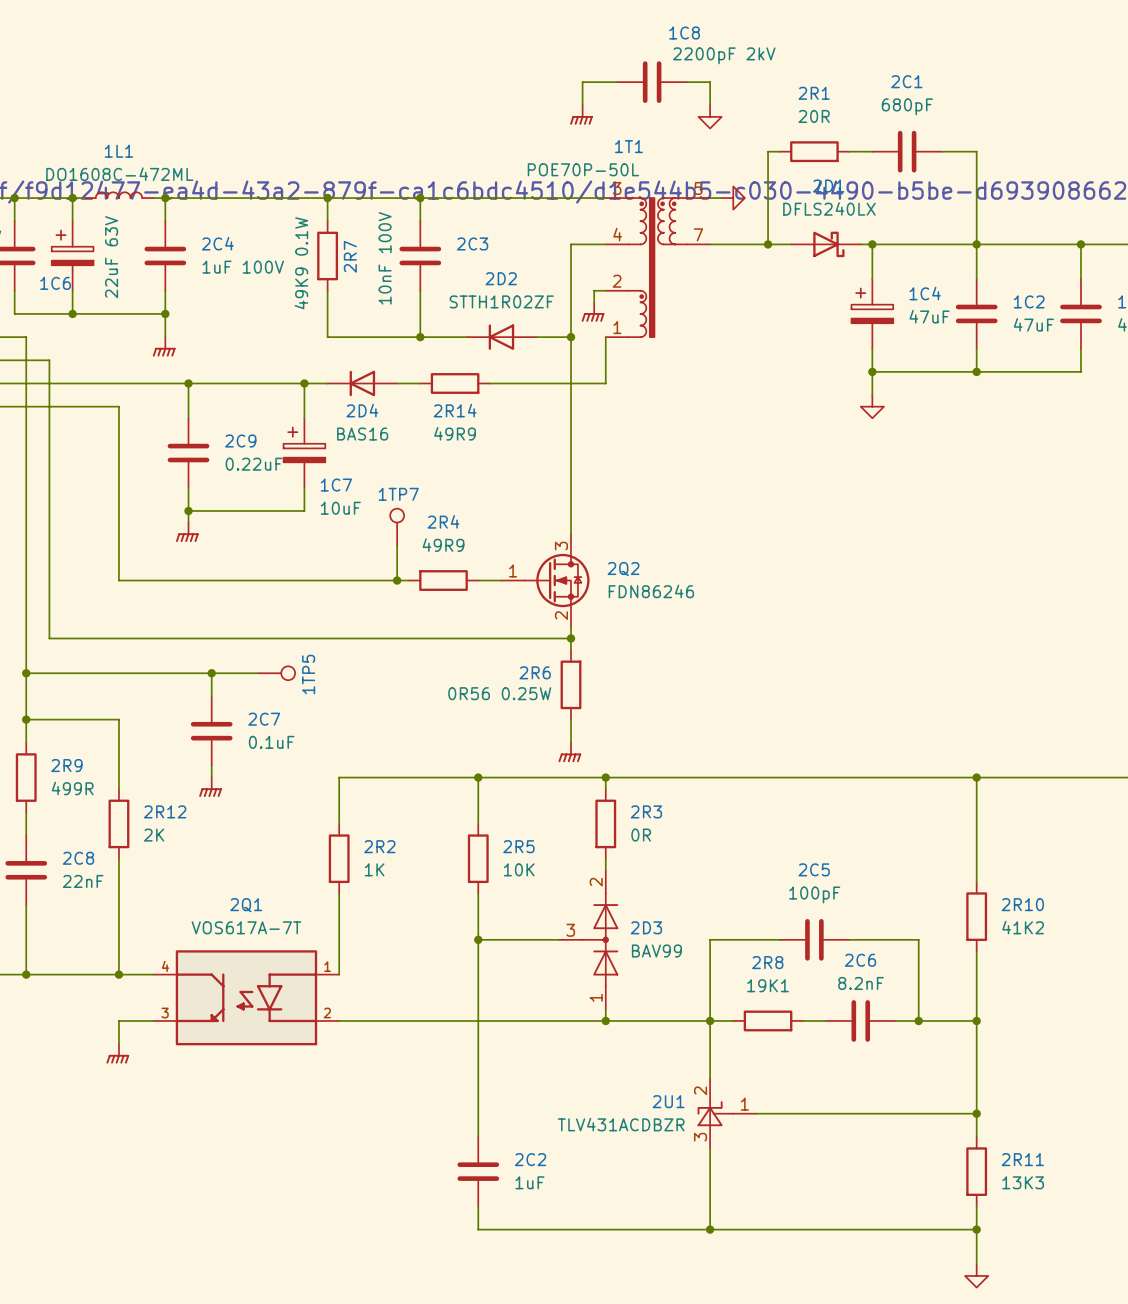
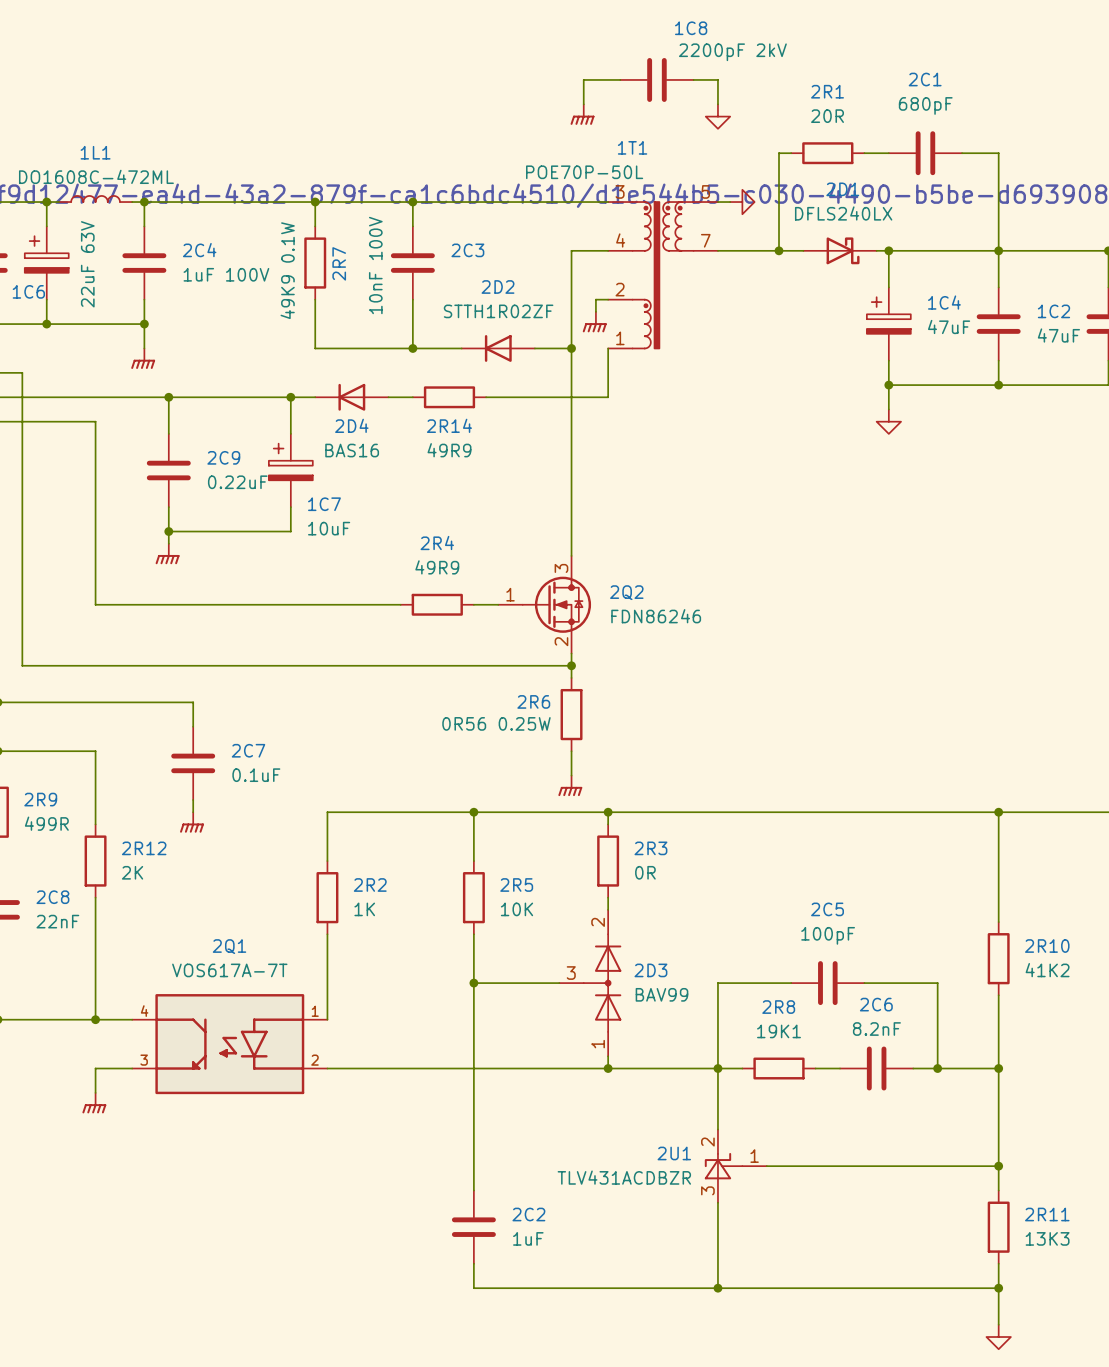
1TP7: (397, 527) -> none
wire: (397, 545) (397, 580) -> none
junction: (397, 580) -> none
wire: (211, 673) (258, 673) -> none
junction: (211, 673) -> none
1TP5: (276, 673) -> none

